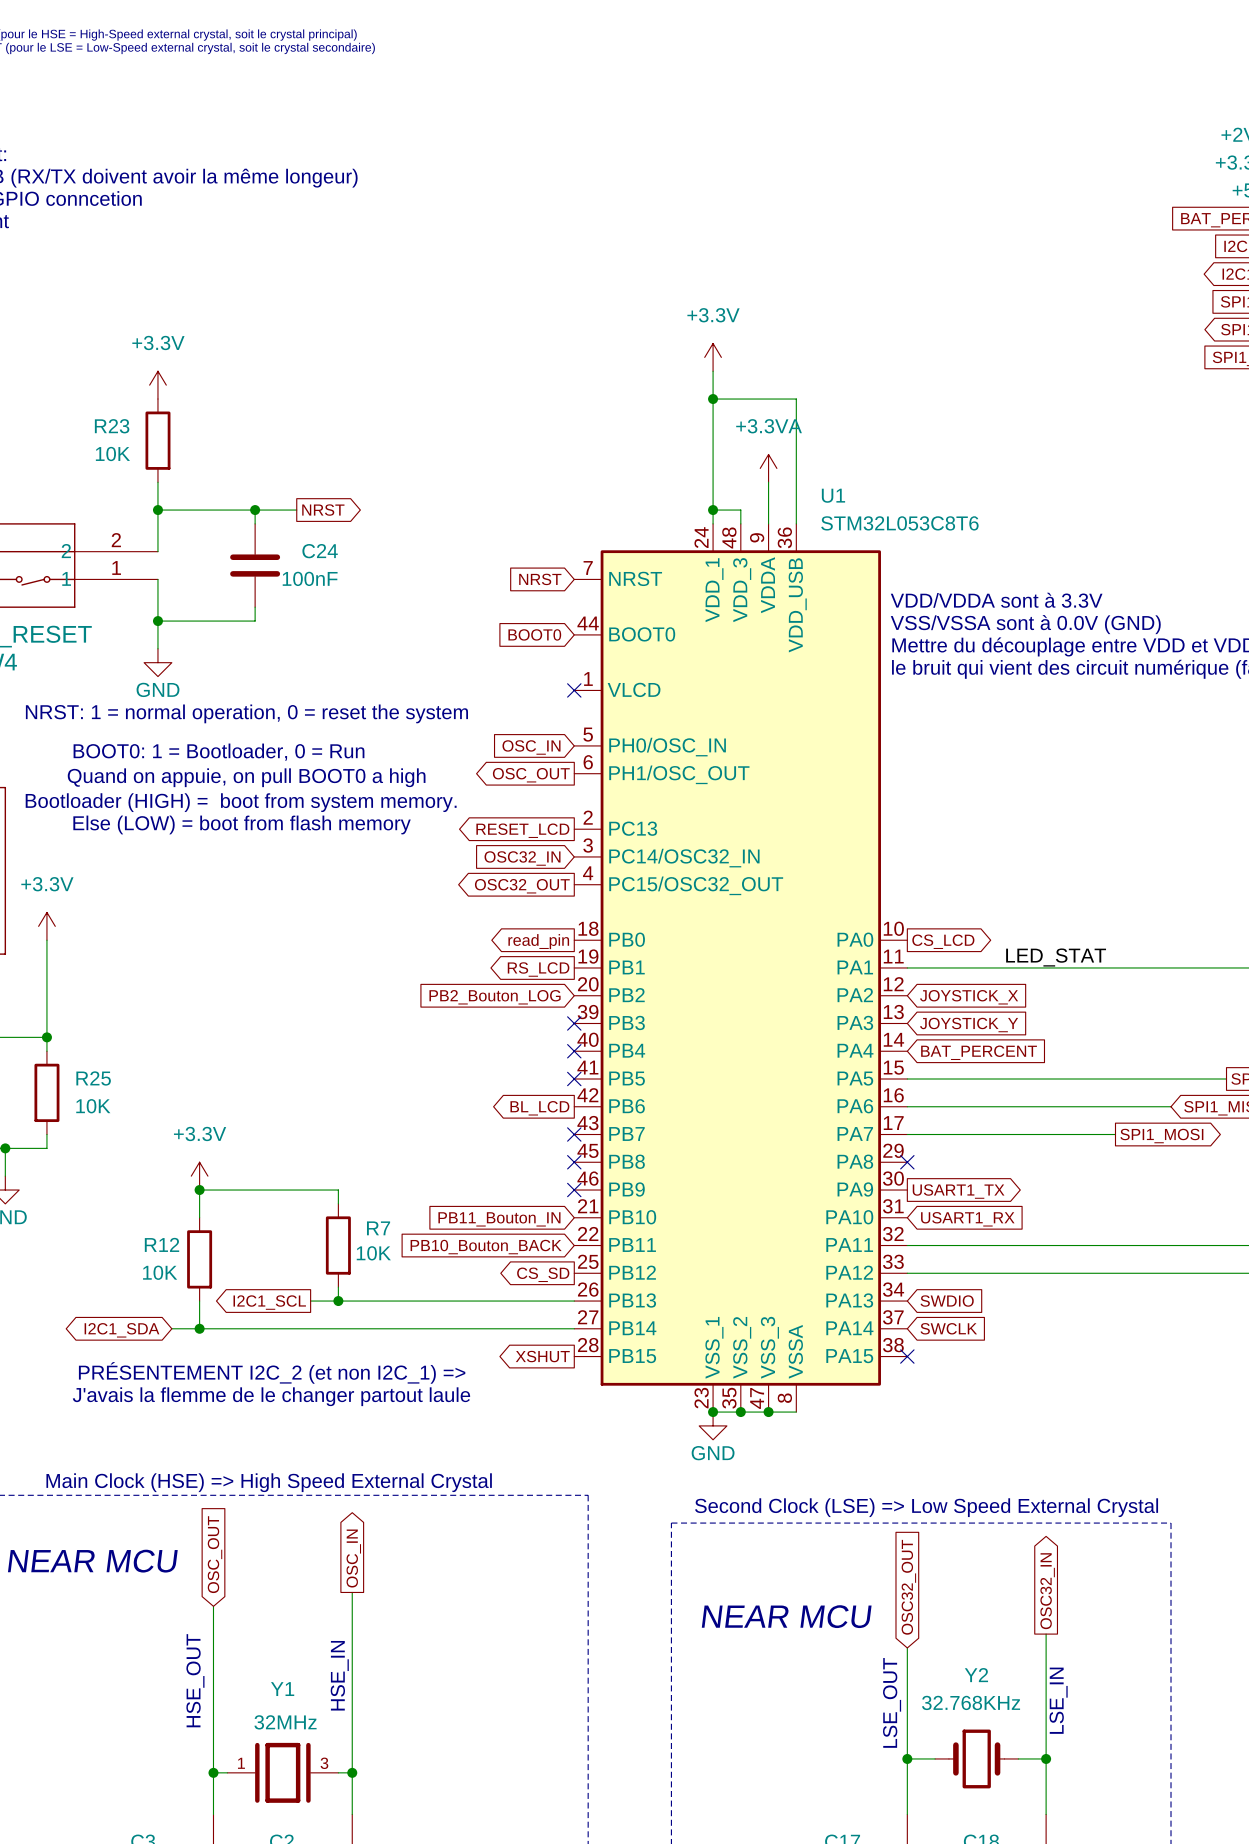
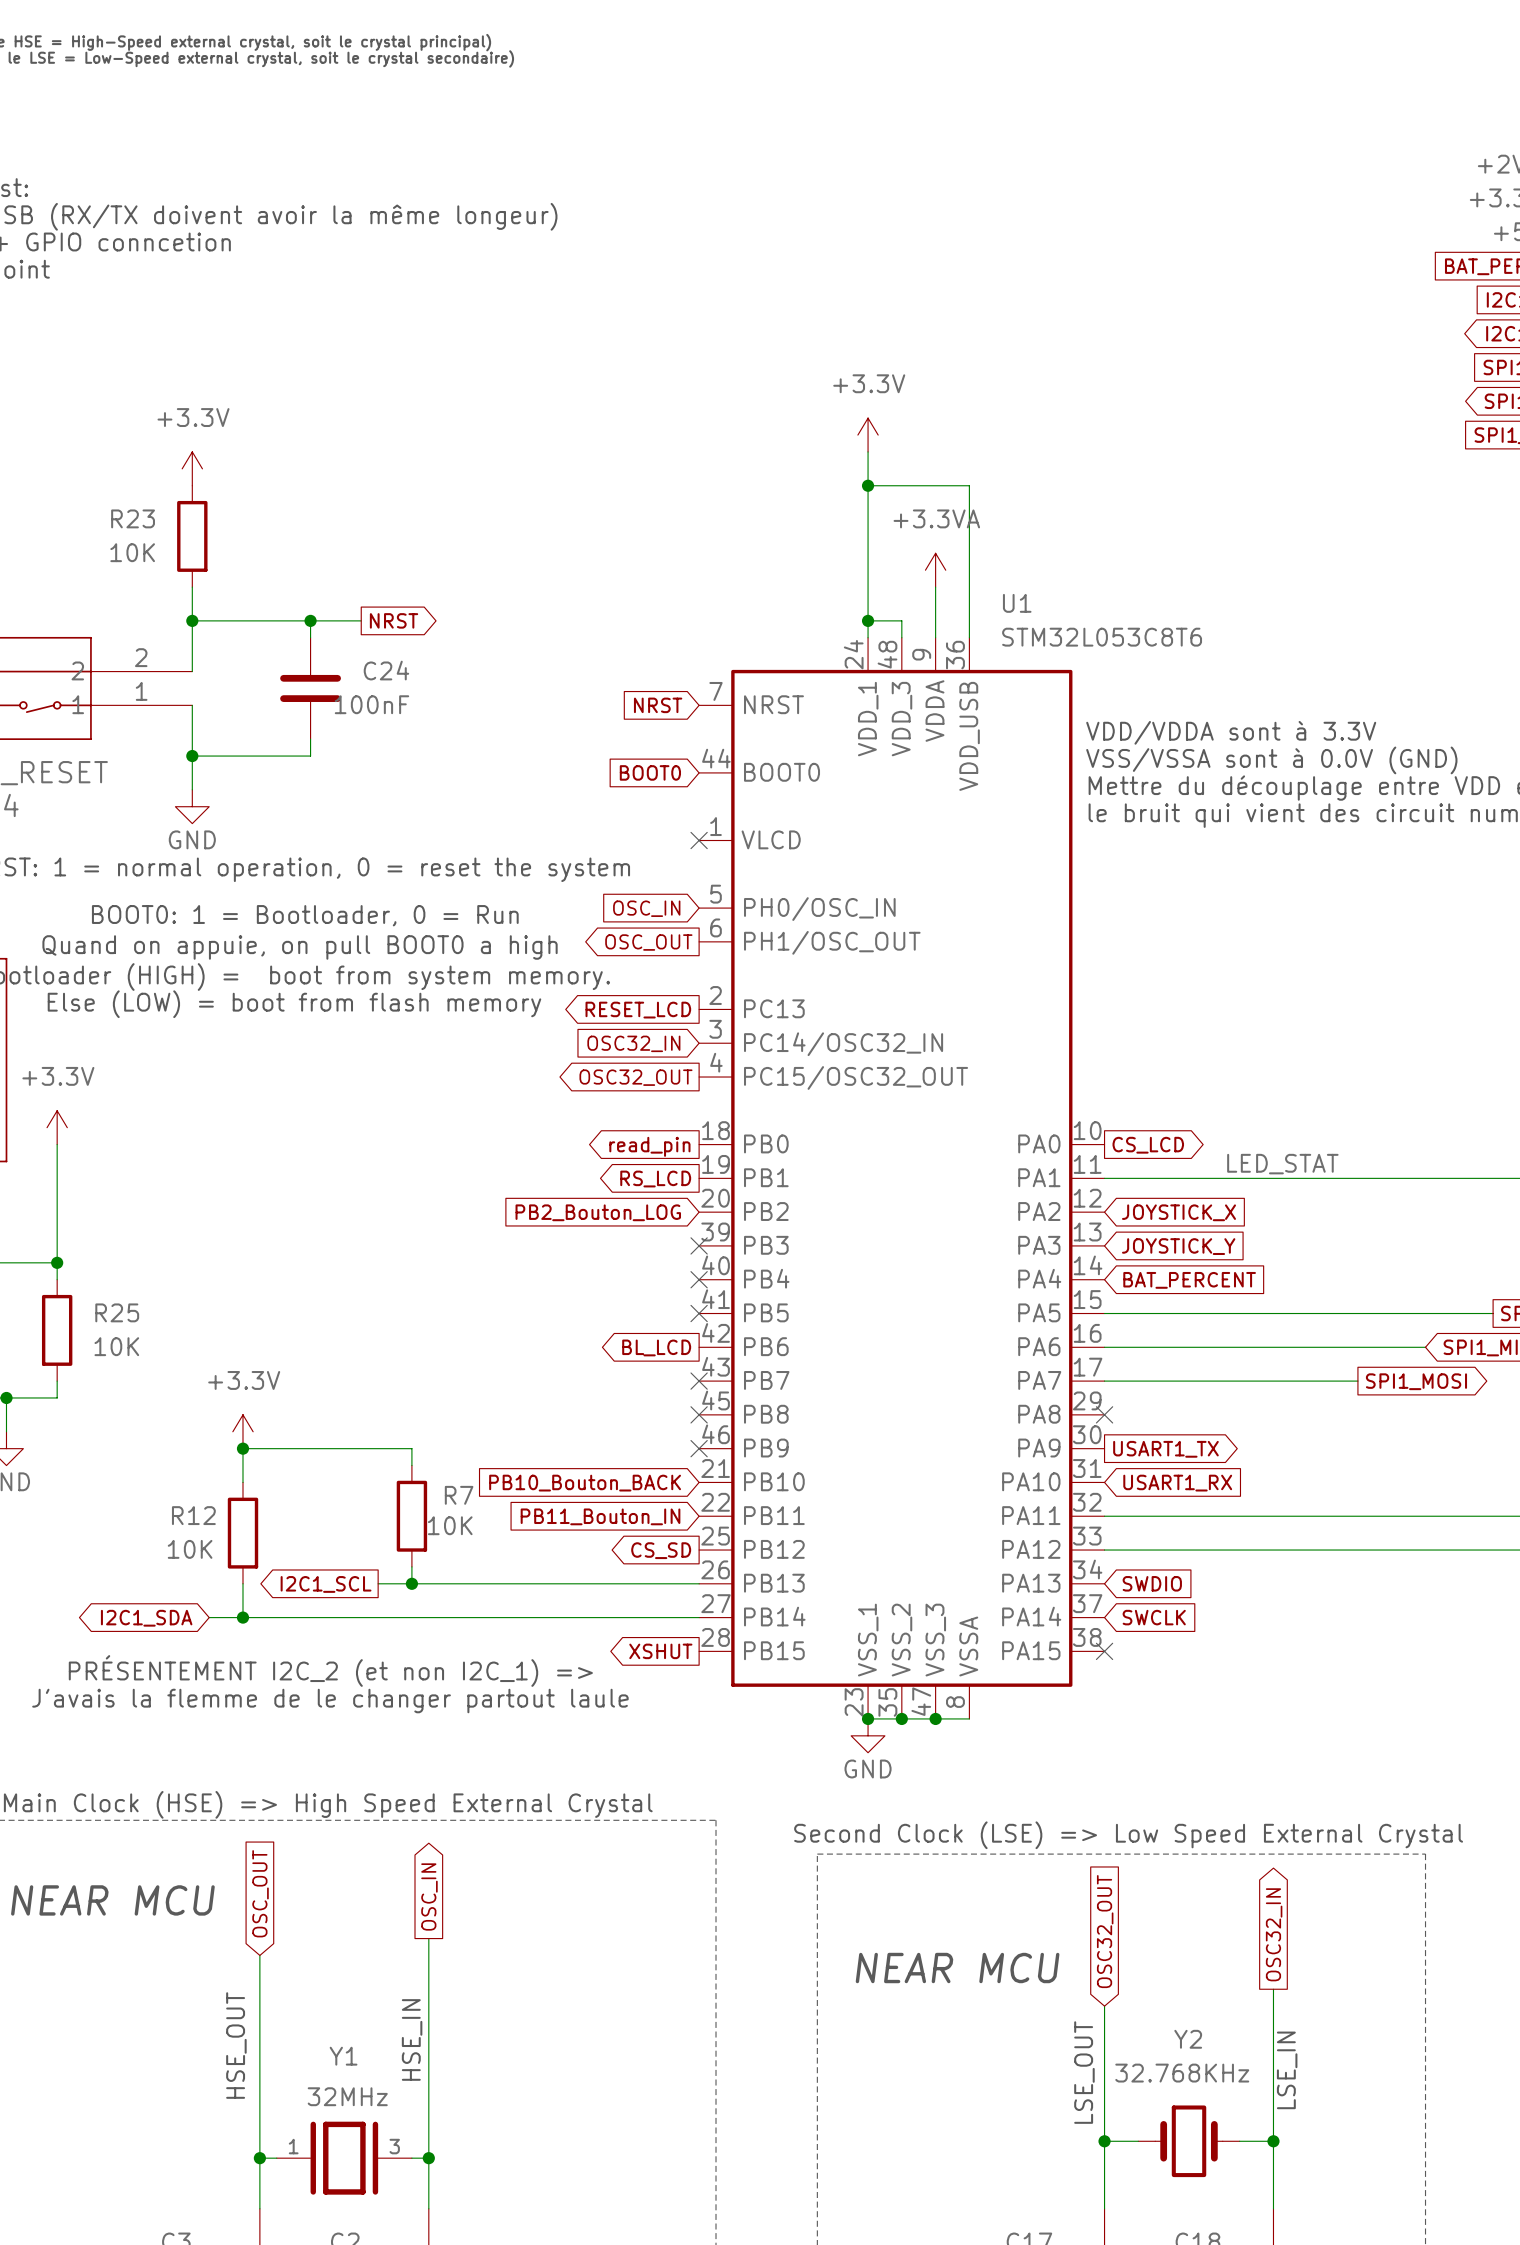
global label: PB11_Bouton_IN (499, 1219) -> PB10_Bouton_BACK (585, 1483)
global label: PB10_Bouton_BACK (486, 1247) -> PB11_Bouton_IN (600, 1516)

